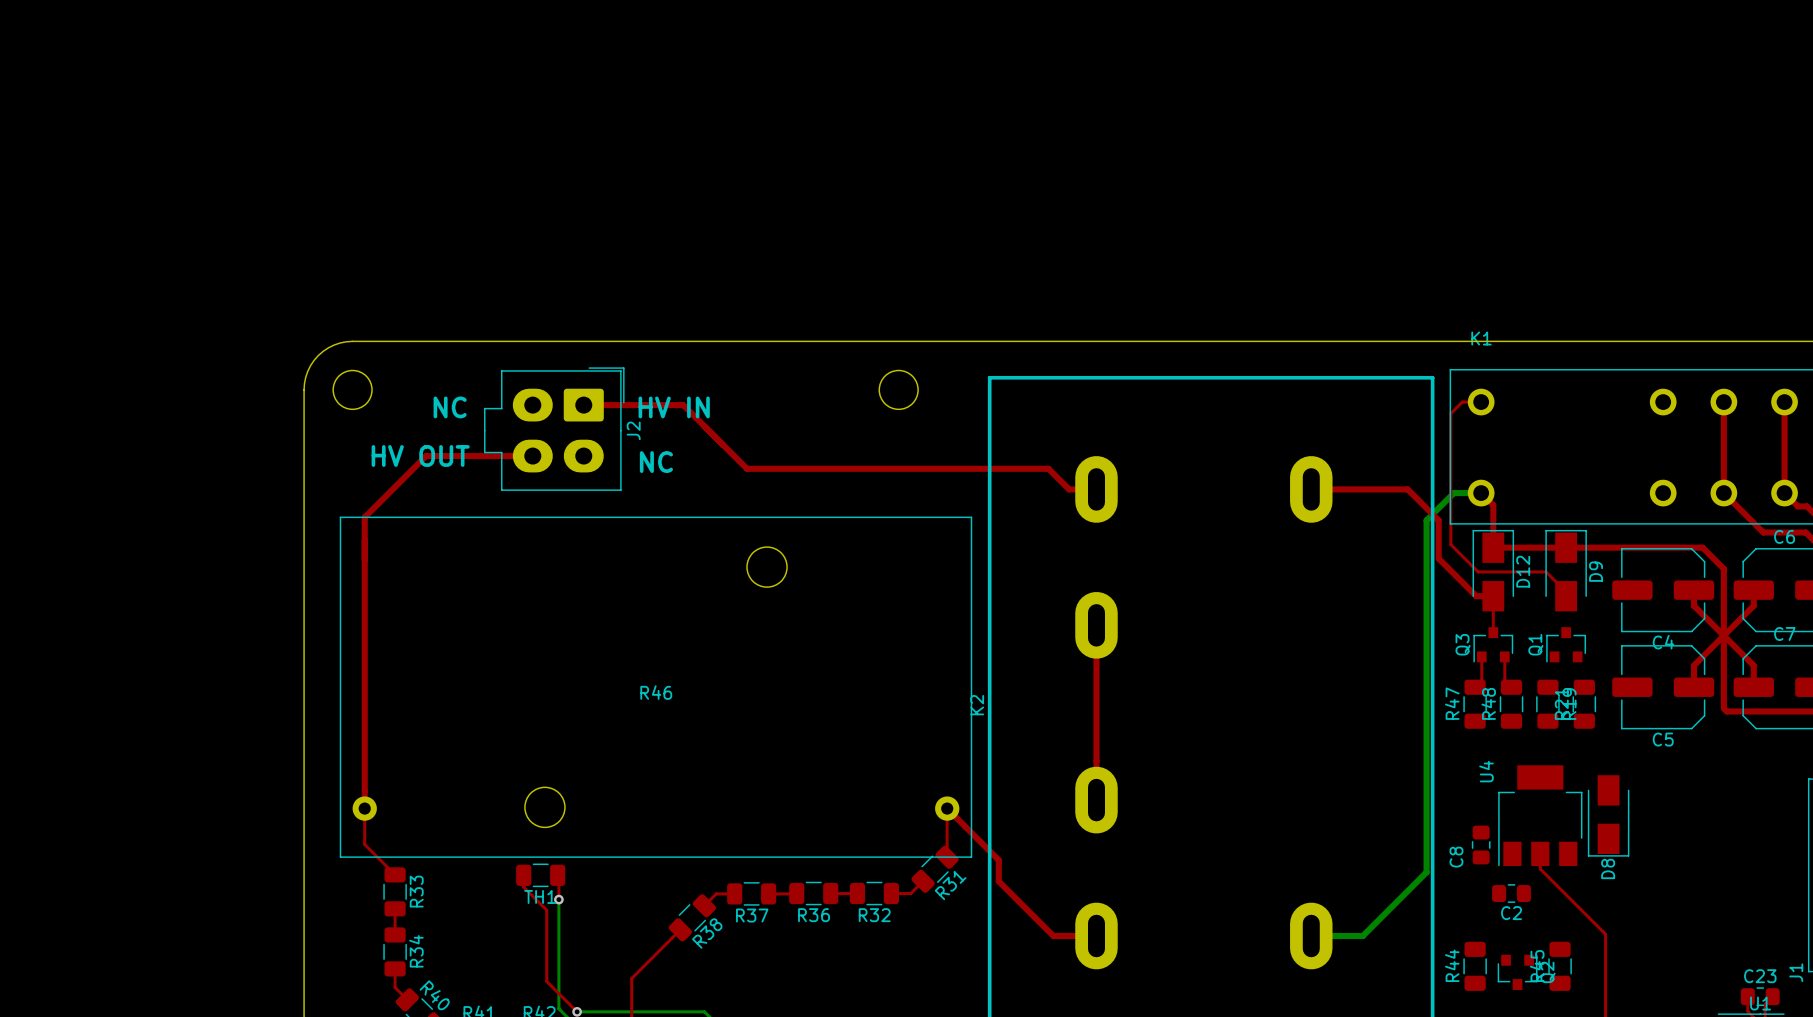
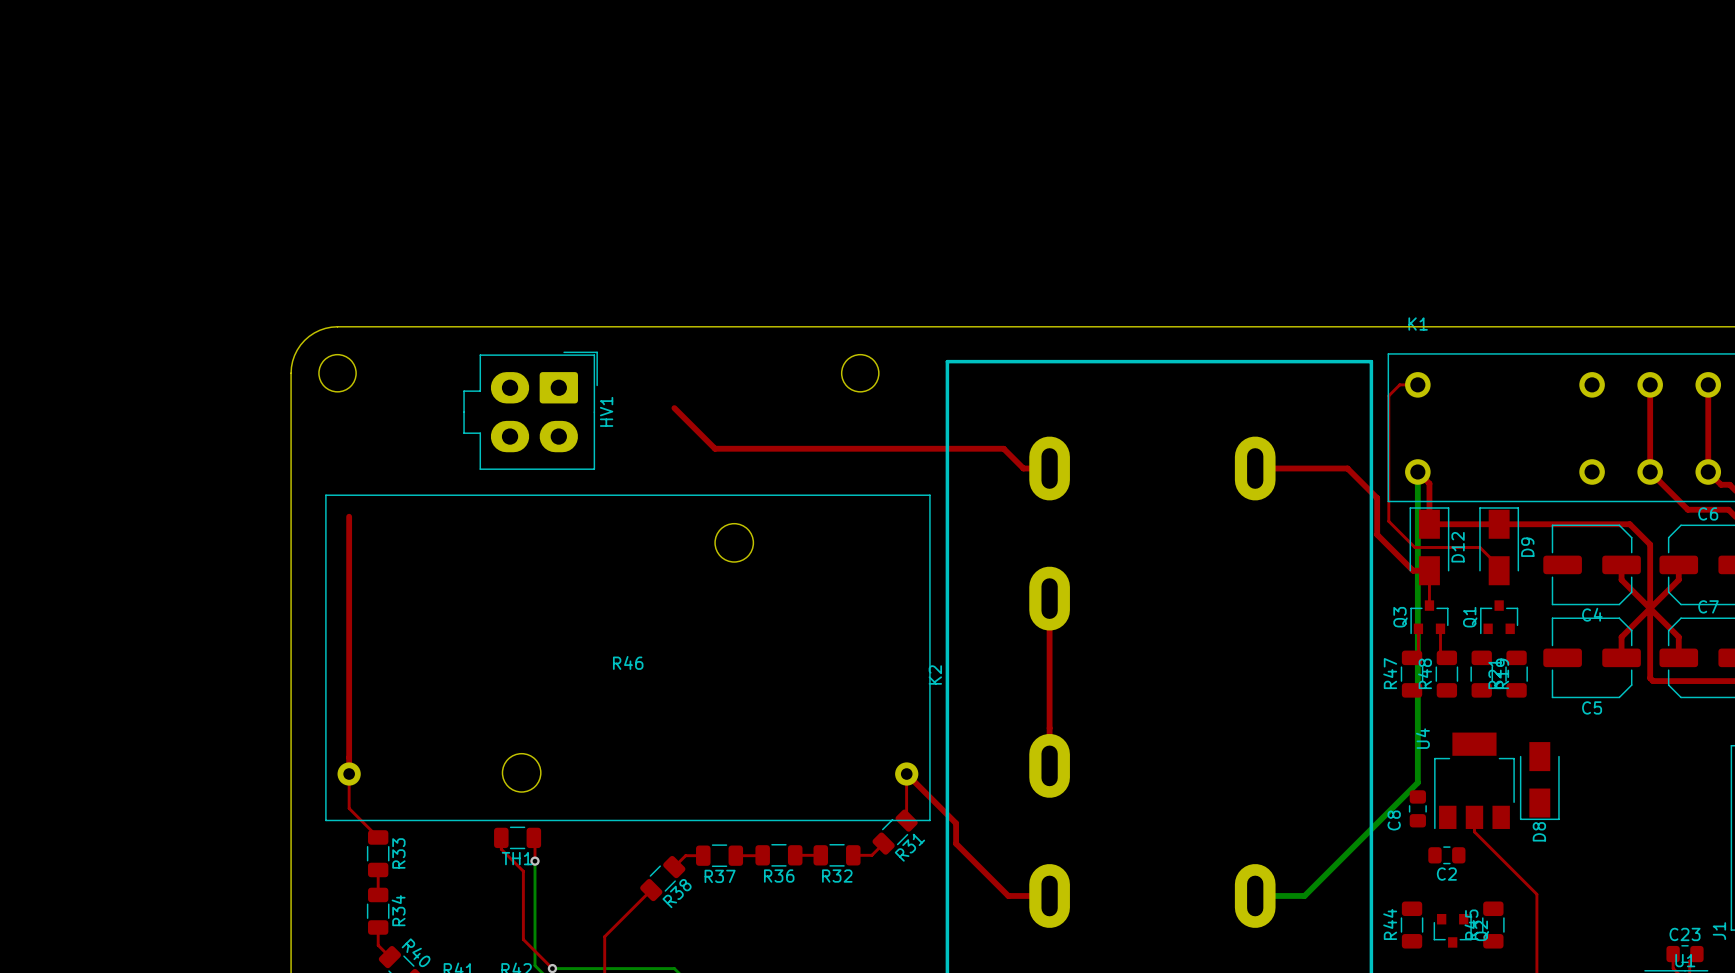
top track: (583, 405) (683, 405) (704, 426) -> none
text: NC (450, 407) -> none
text: HV IN (674, 407) -> none
J2 name: J2 (633, 430) -> HV1 (606, 411)
text: HV OUT (420, 455) -> none
top track: (532, 456) (426, 456) (364, 517) (364, 539) -> none
text: NC (656, 462) -> none
bottom track: (1481, 493) (1453, 493) (1426, 520) (1426, 872) -> (1417, 471) (1417, 782) (1365, 835)

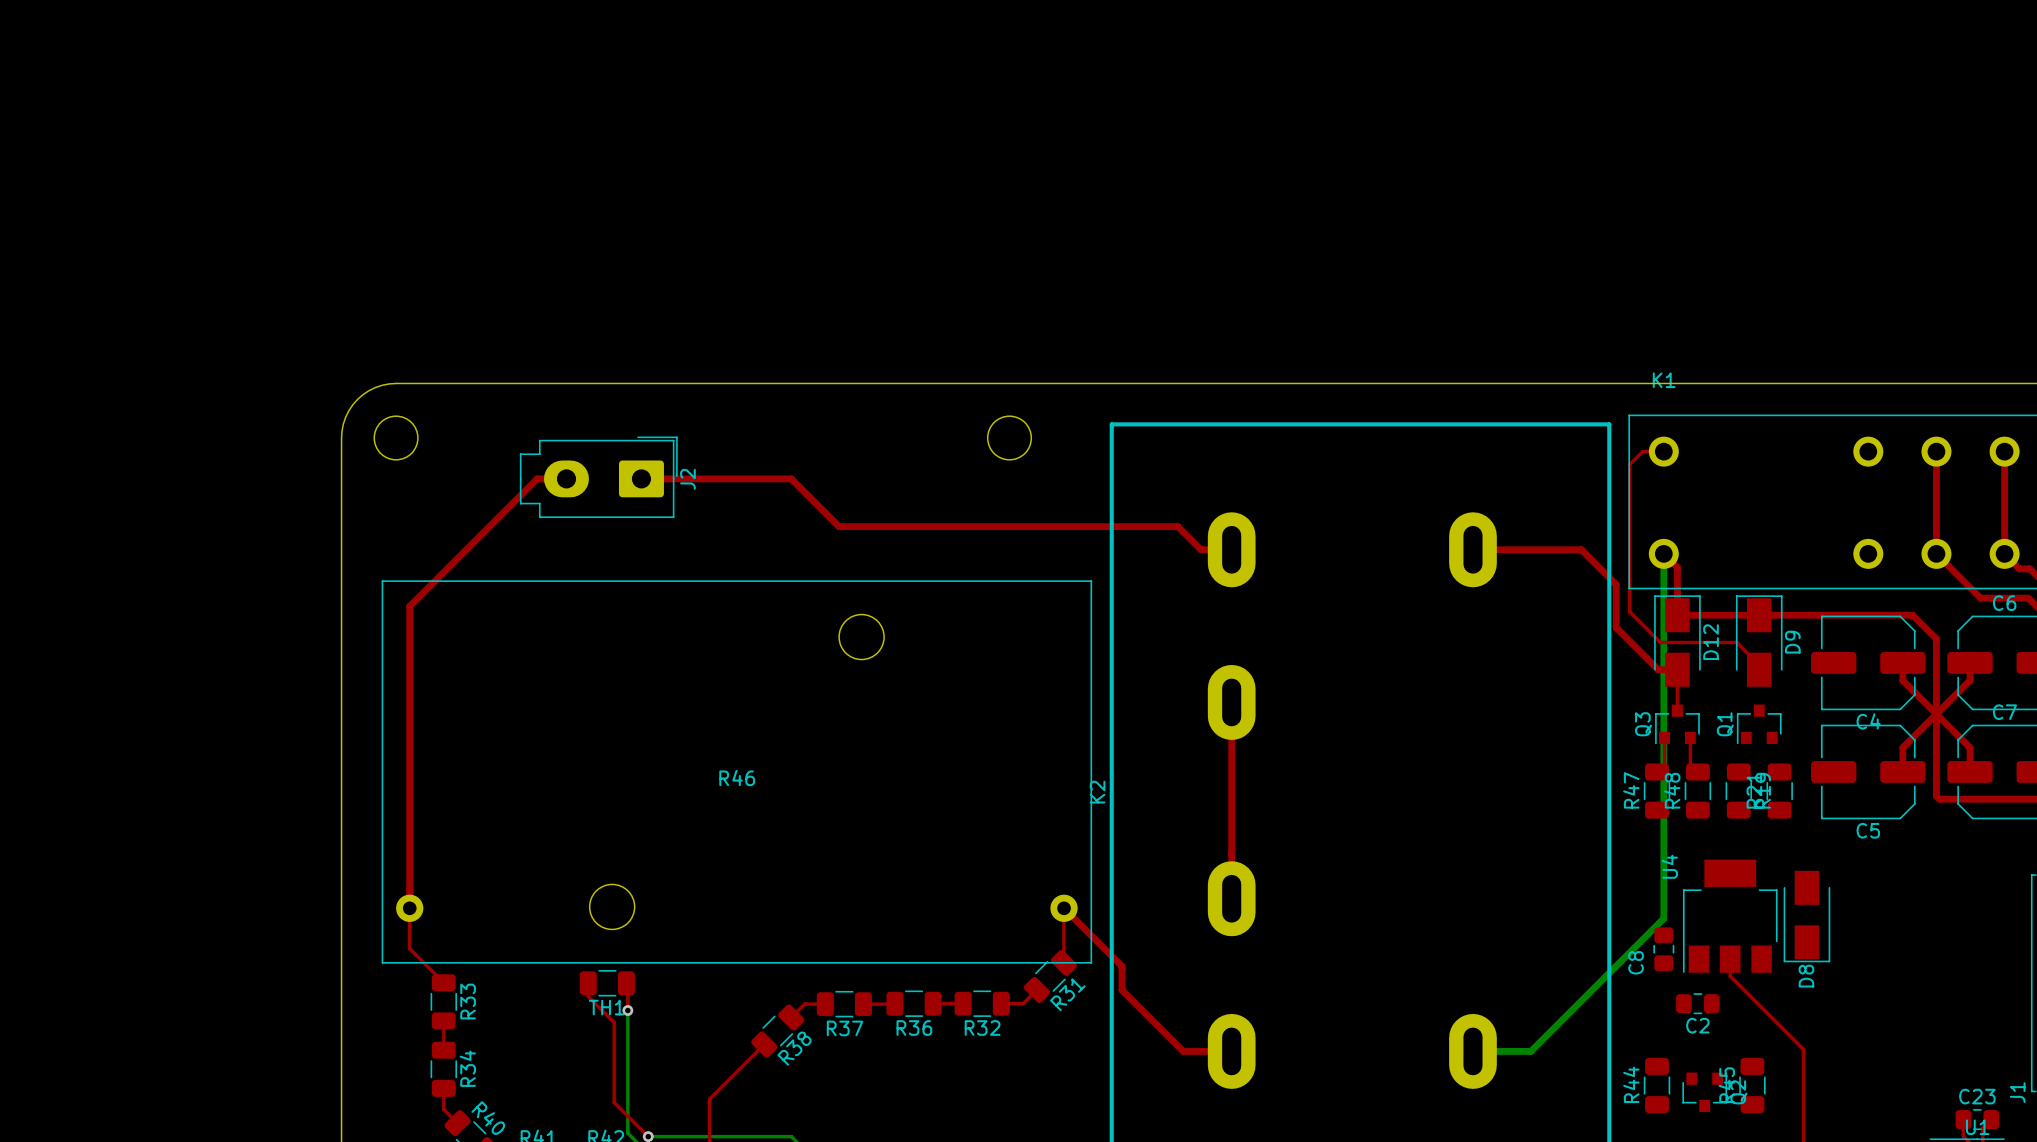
J2: none -> (598, 477)
top track: none -> (566, 478) (537, 478) (409, 606)
top track: none -> (641, 478) (791, 478)
HV1: (530, 410) -> none

